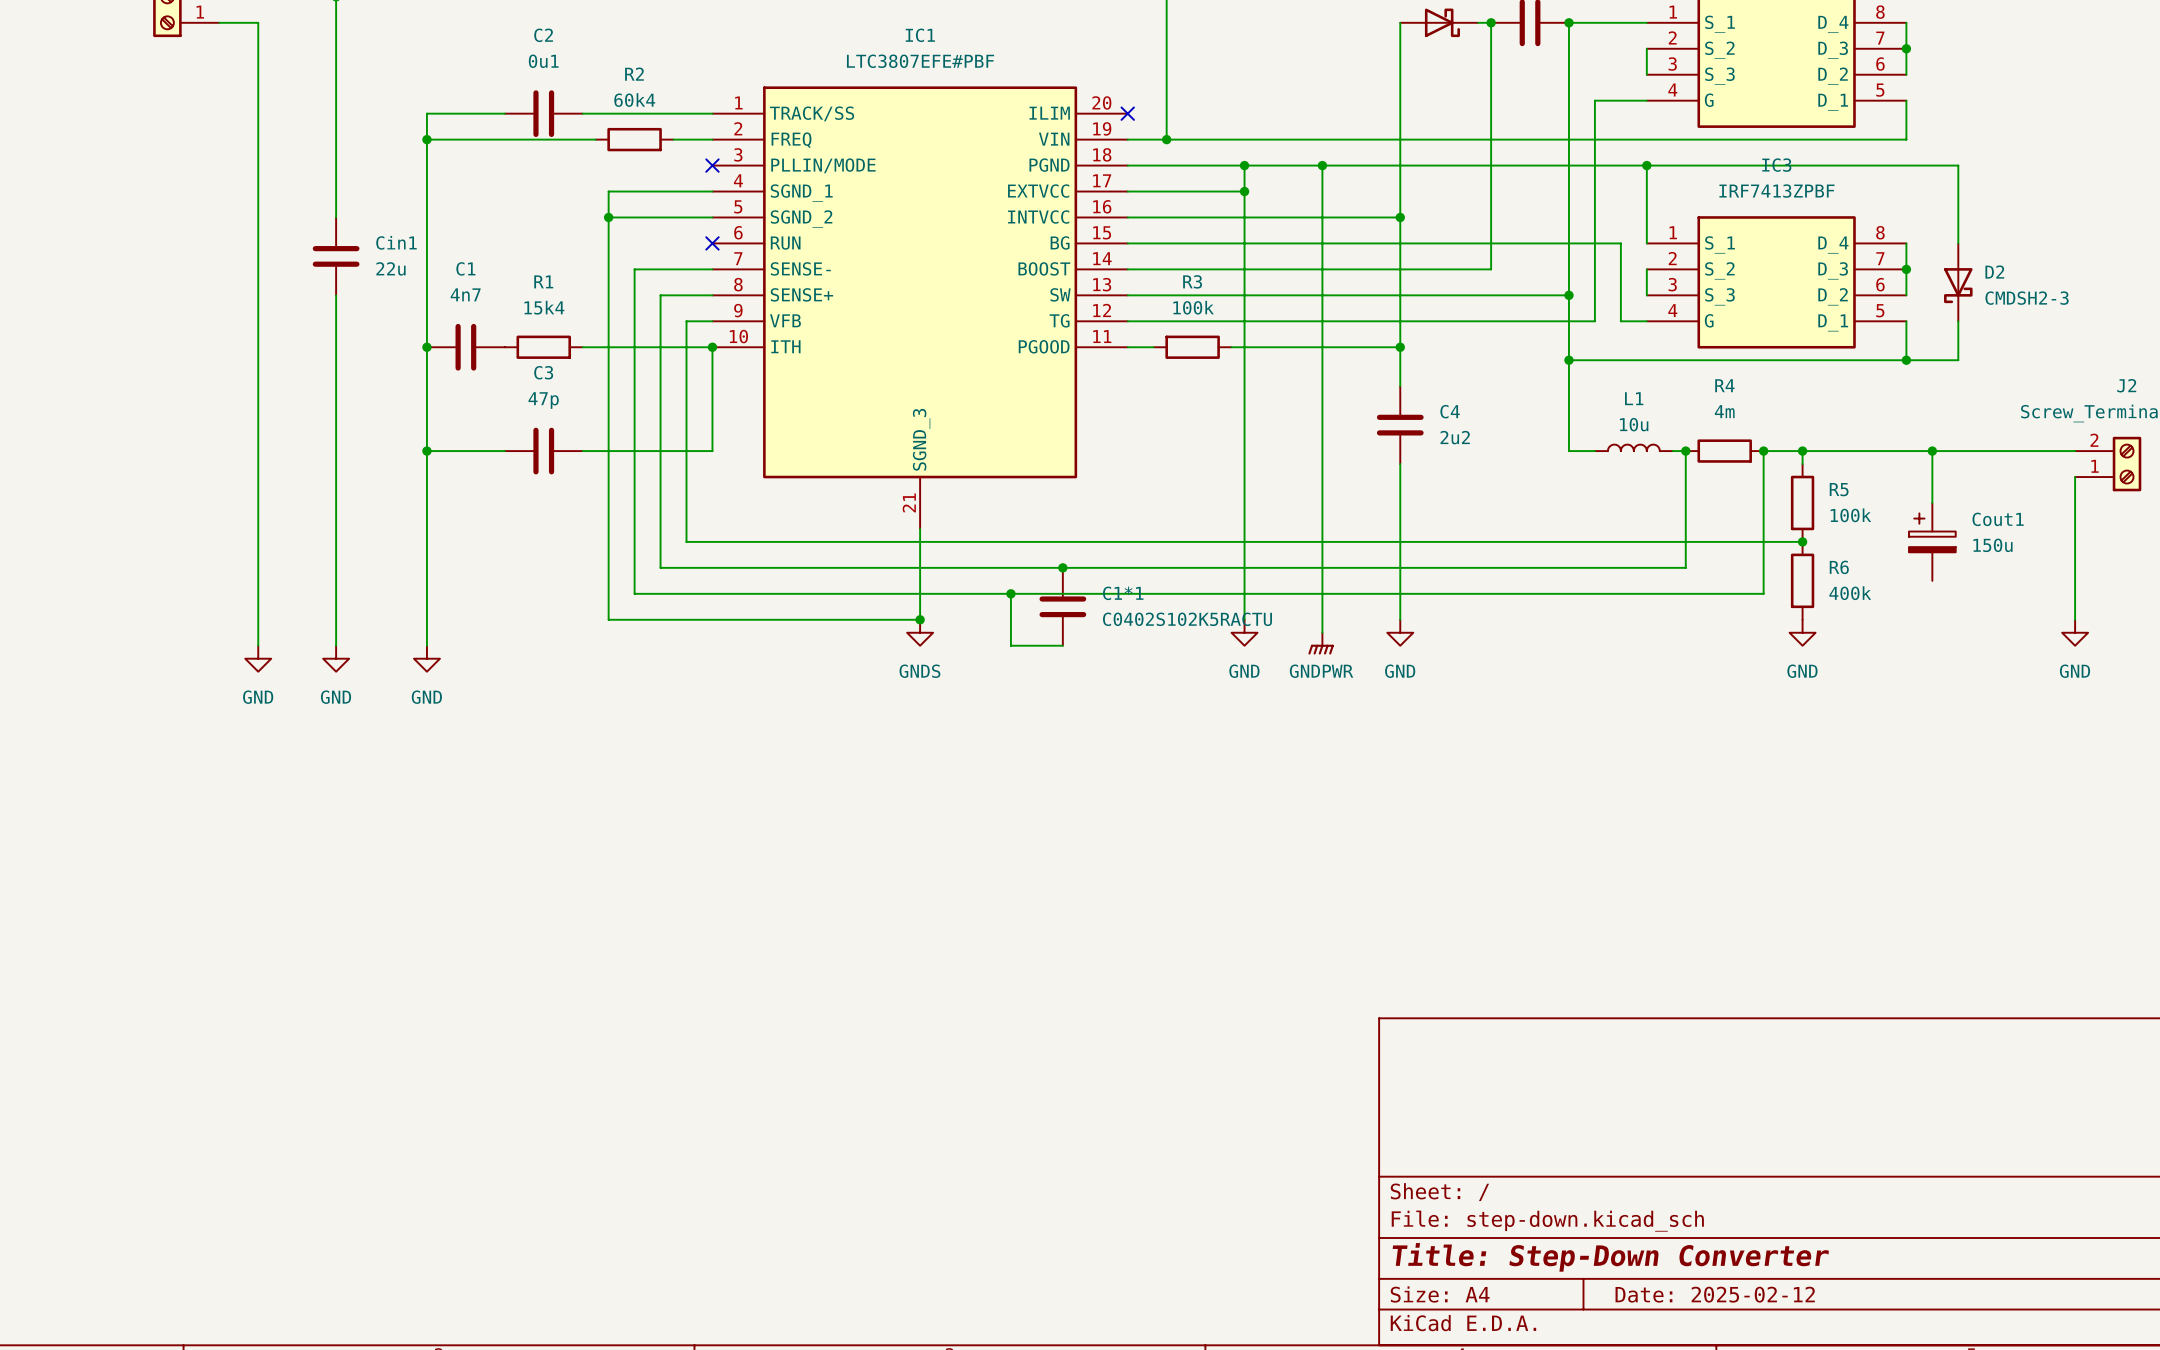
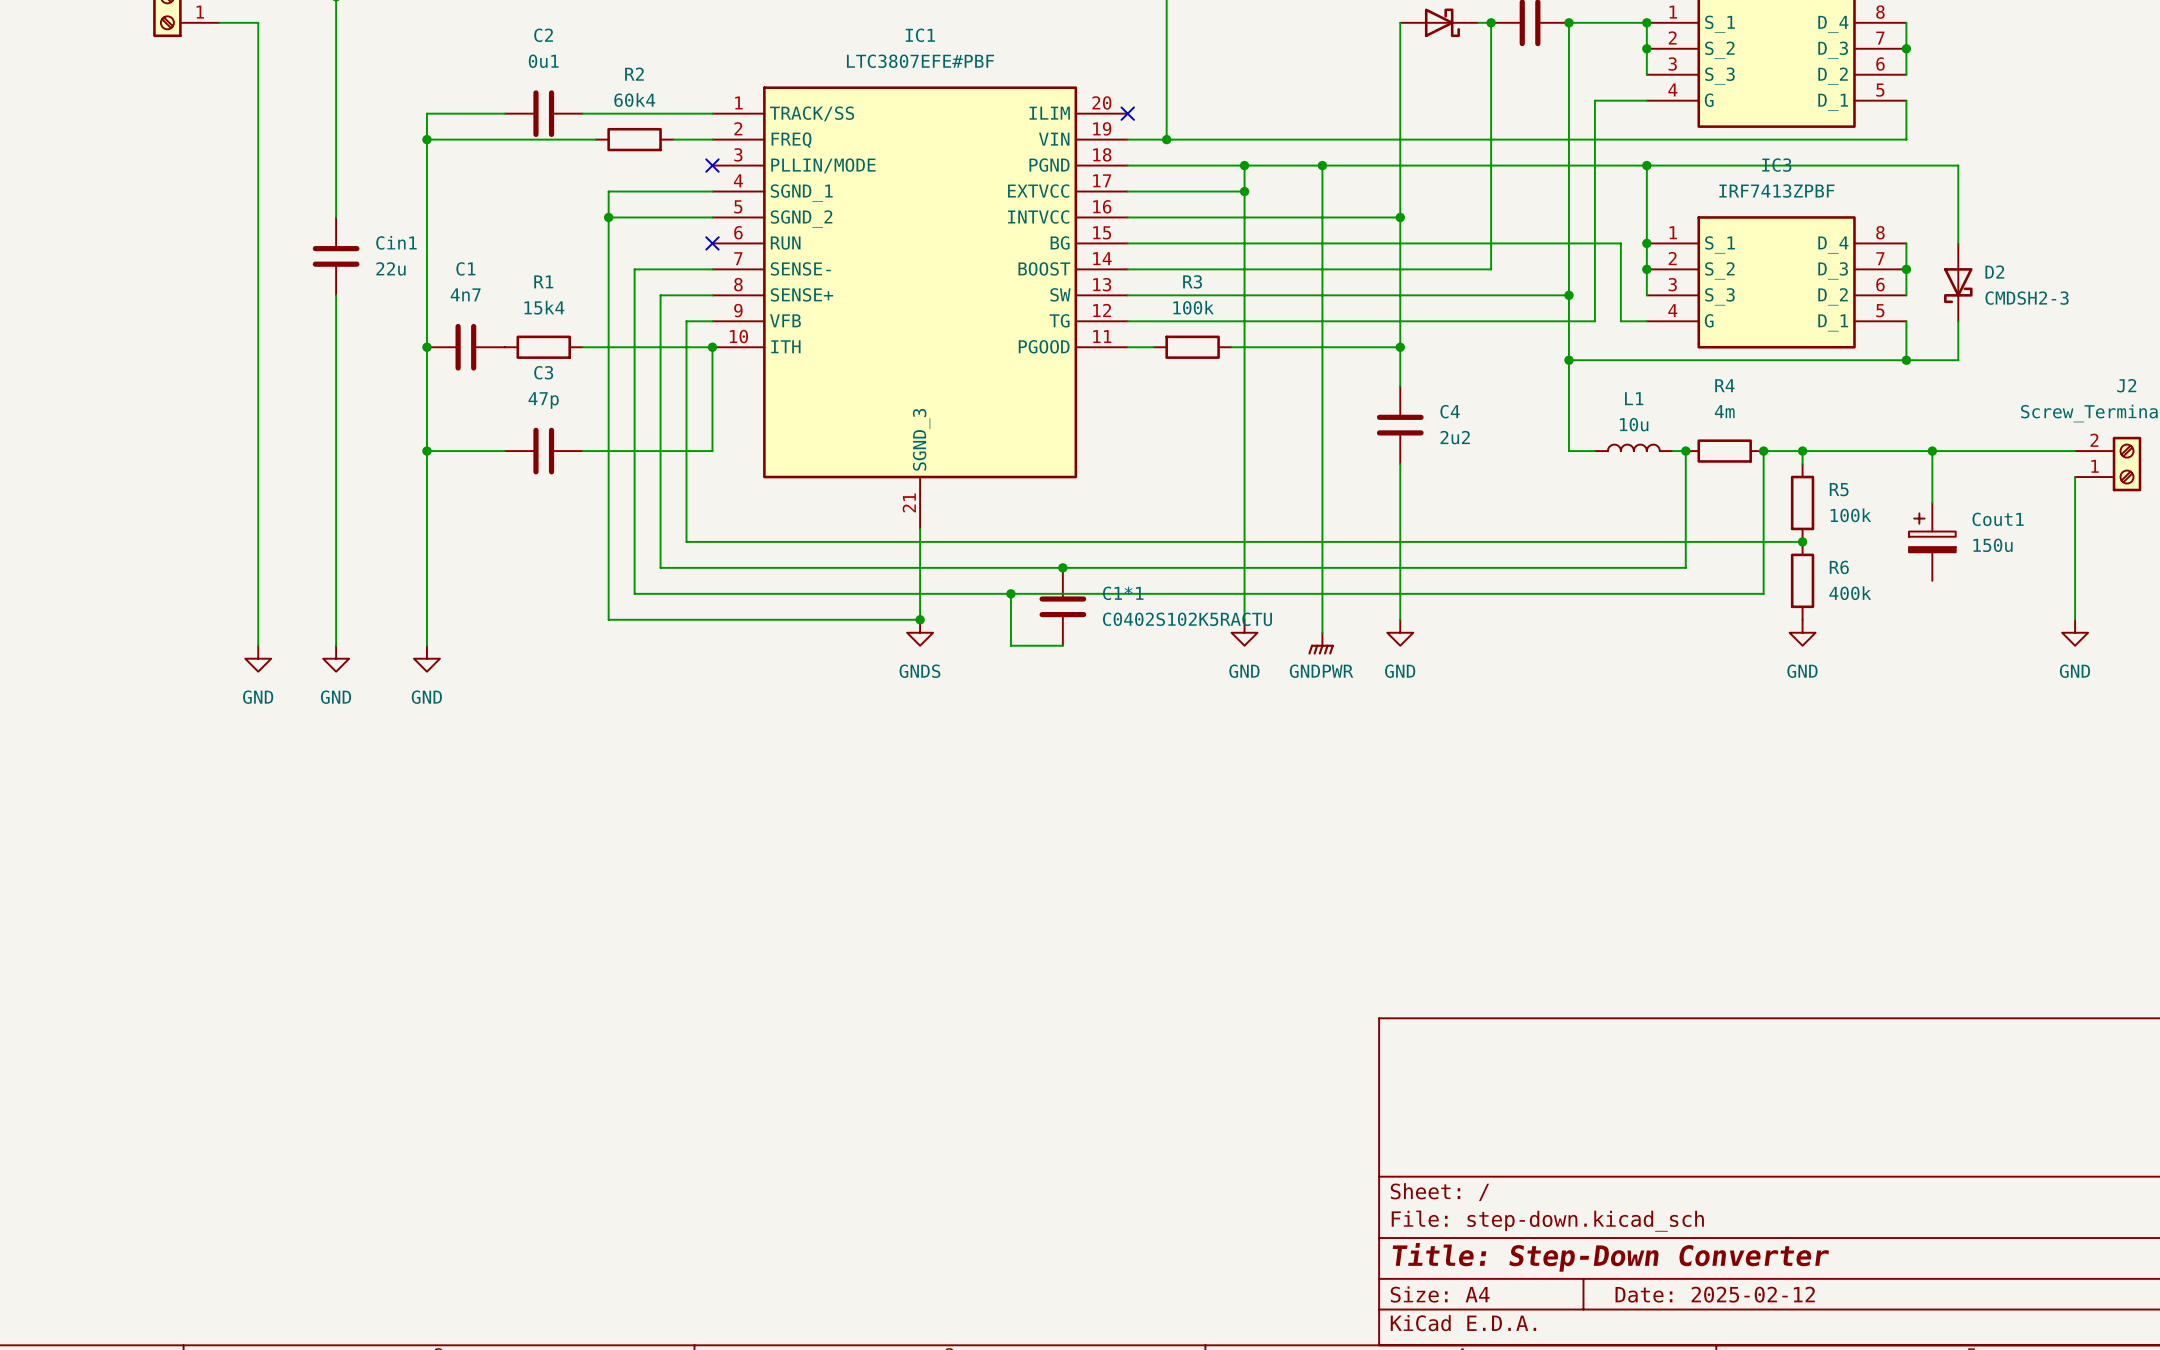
wire: none -> (1646, 22) (1646, 48)
junction: none -> (1646, 22)
junction: none -> (1646, 48)
wire: none -> (1646, 243) (1646, 269)
junction: none -> (1646, 243)
junction: none -> (1646, 269)

